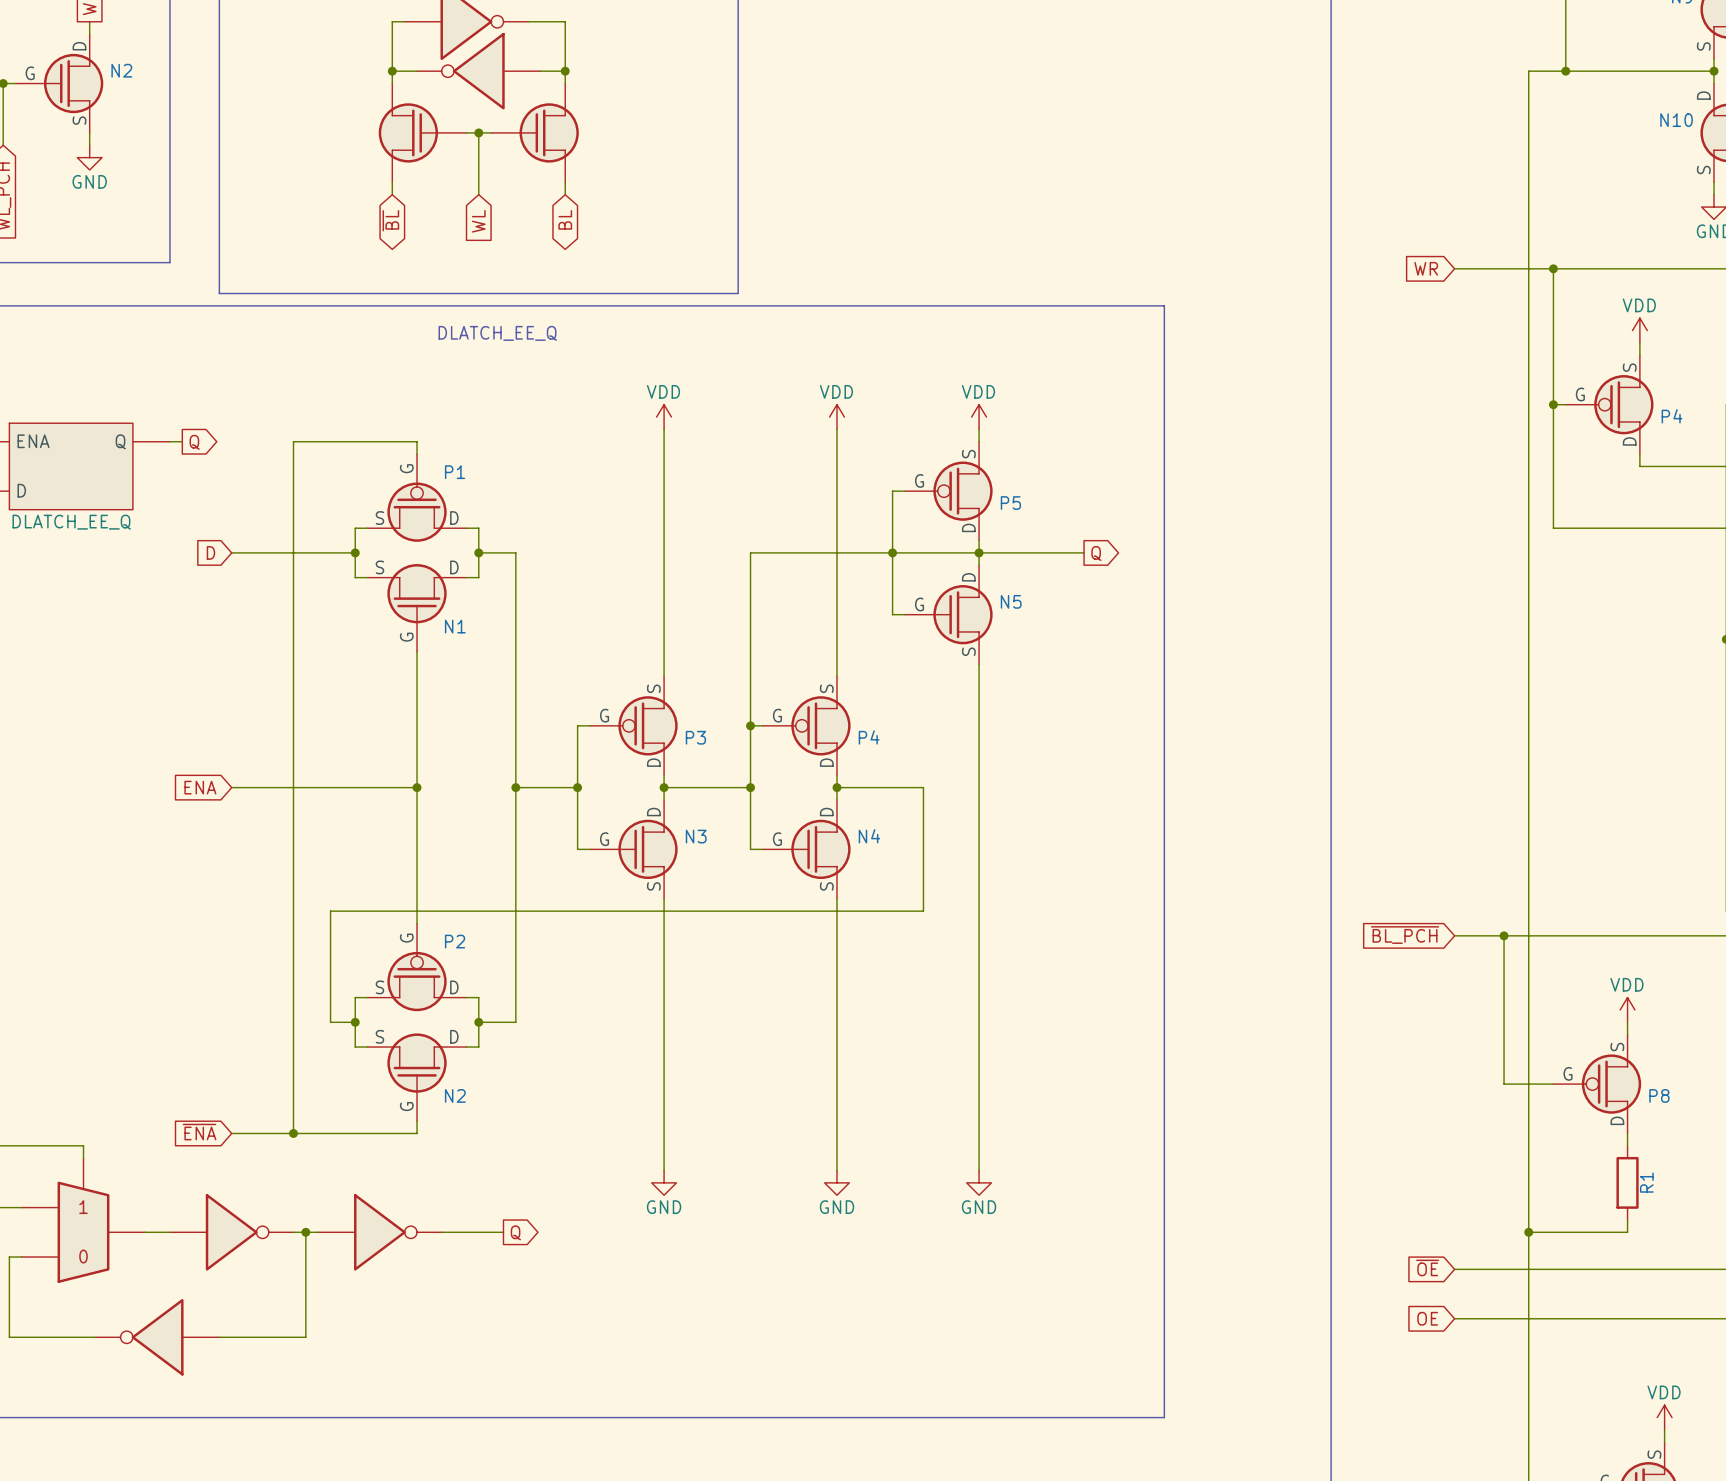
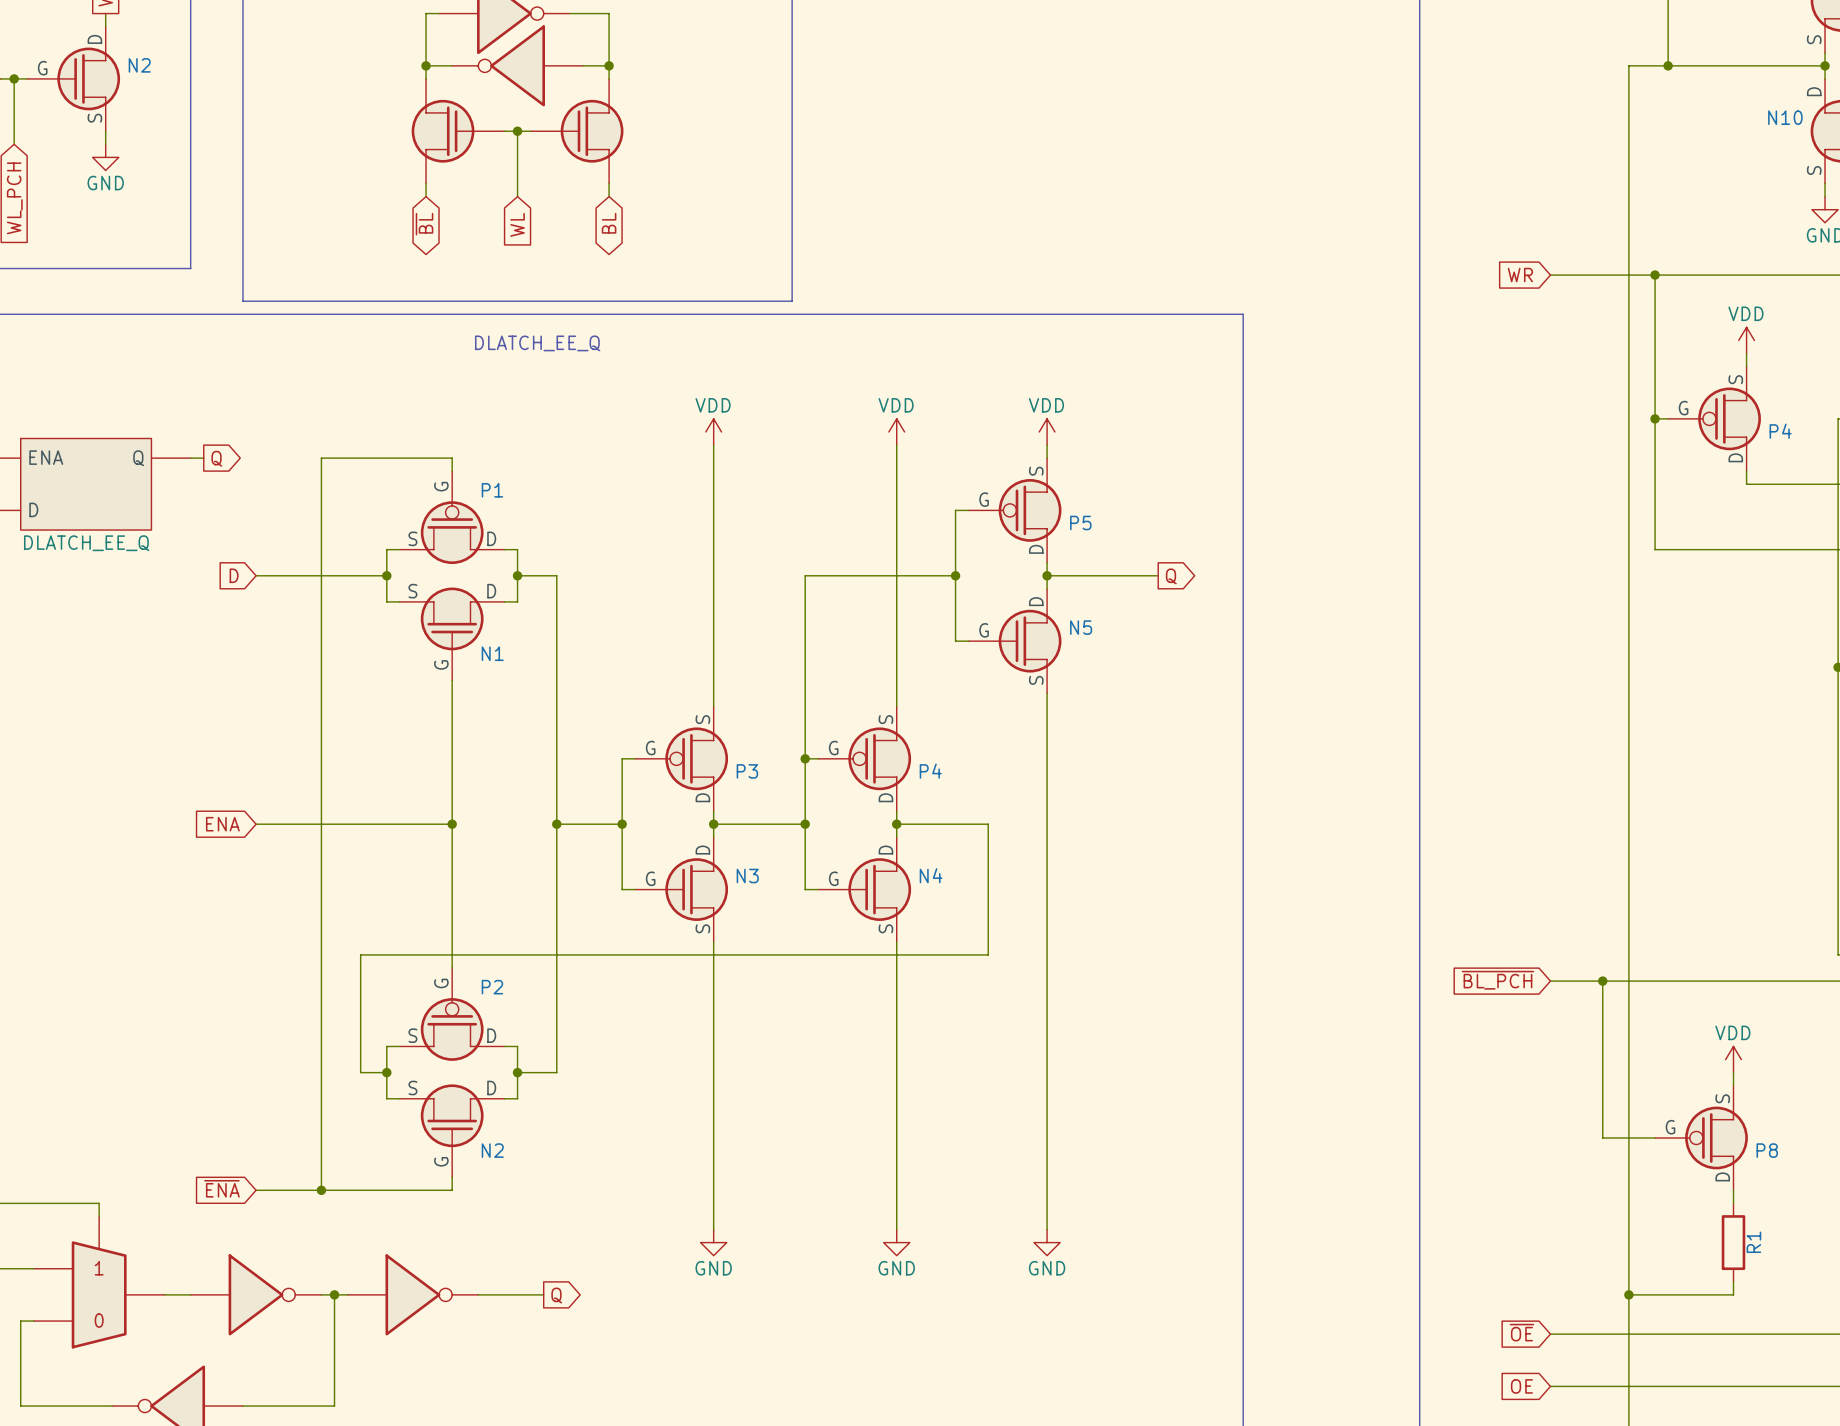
wire: (892, 552) (979, 552) -> none

